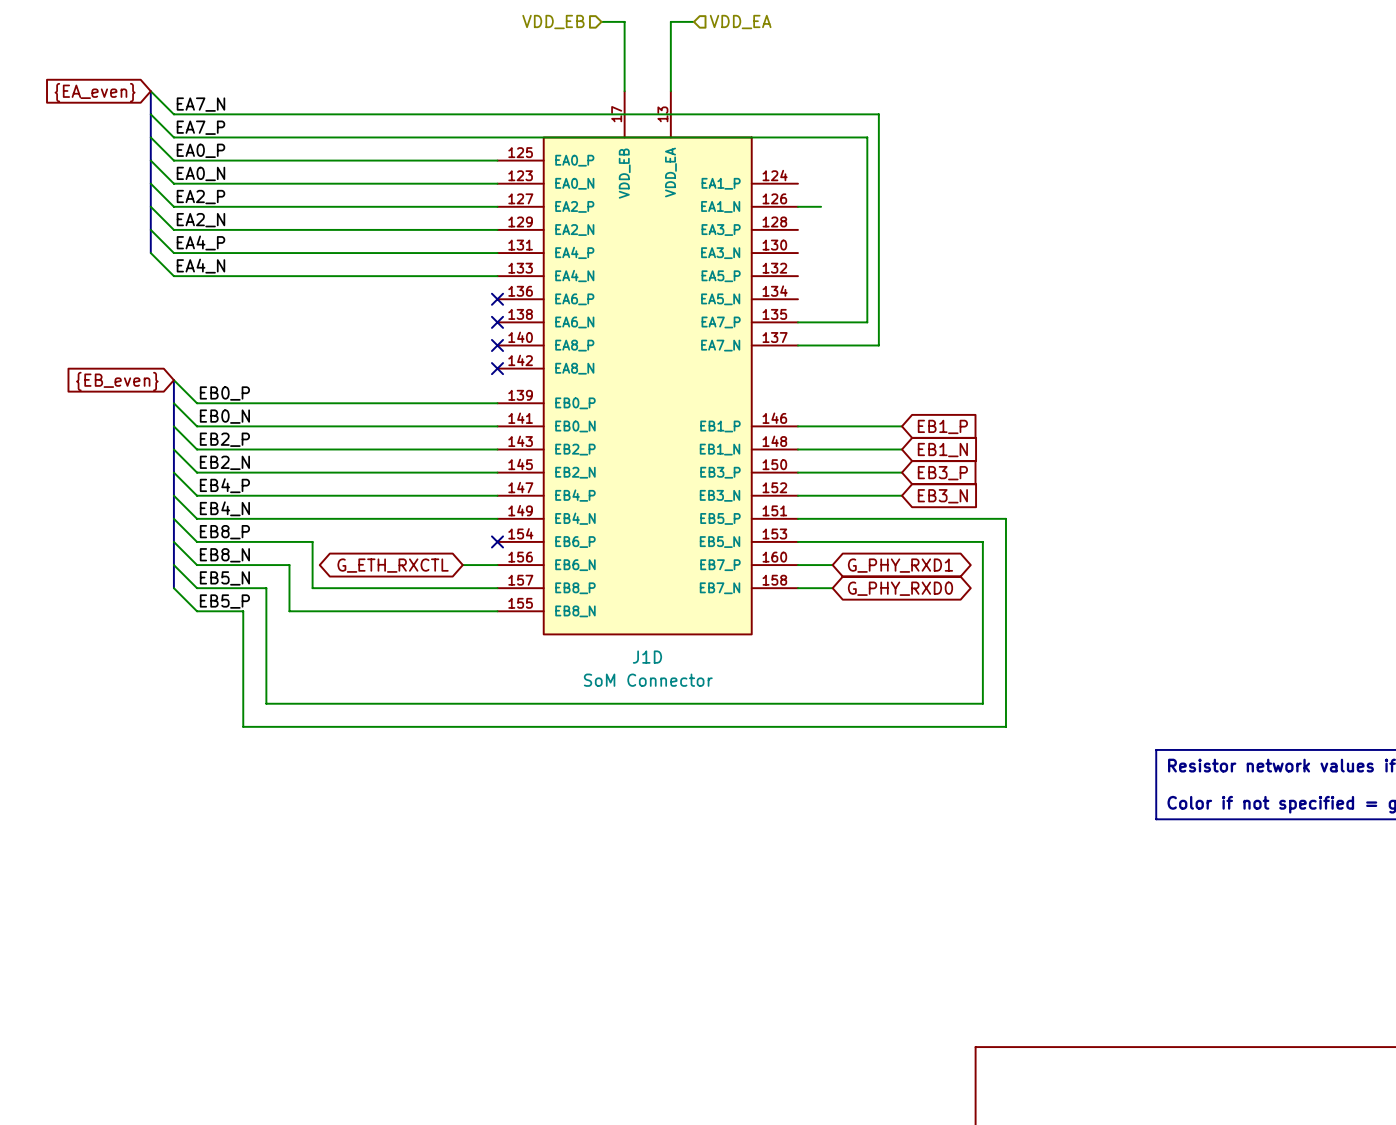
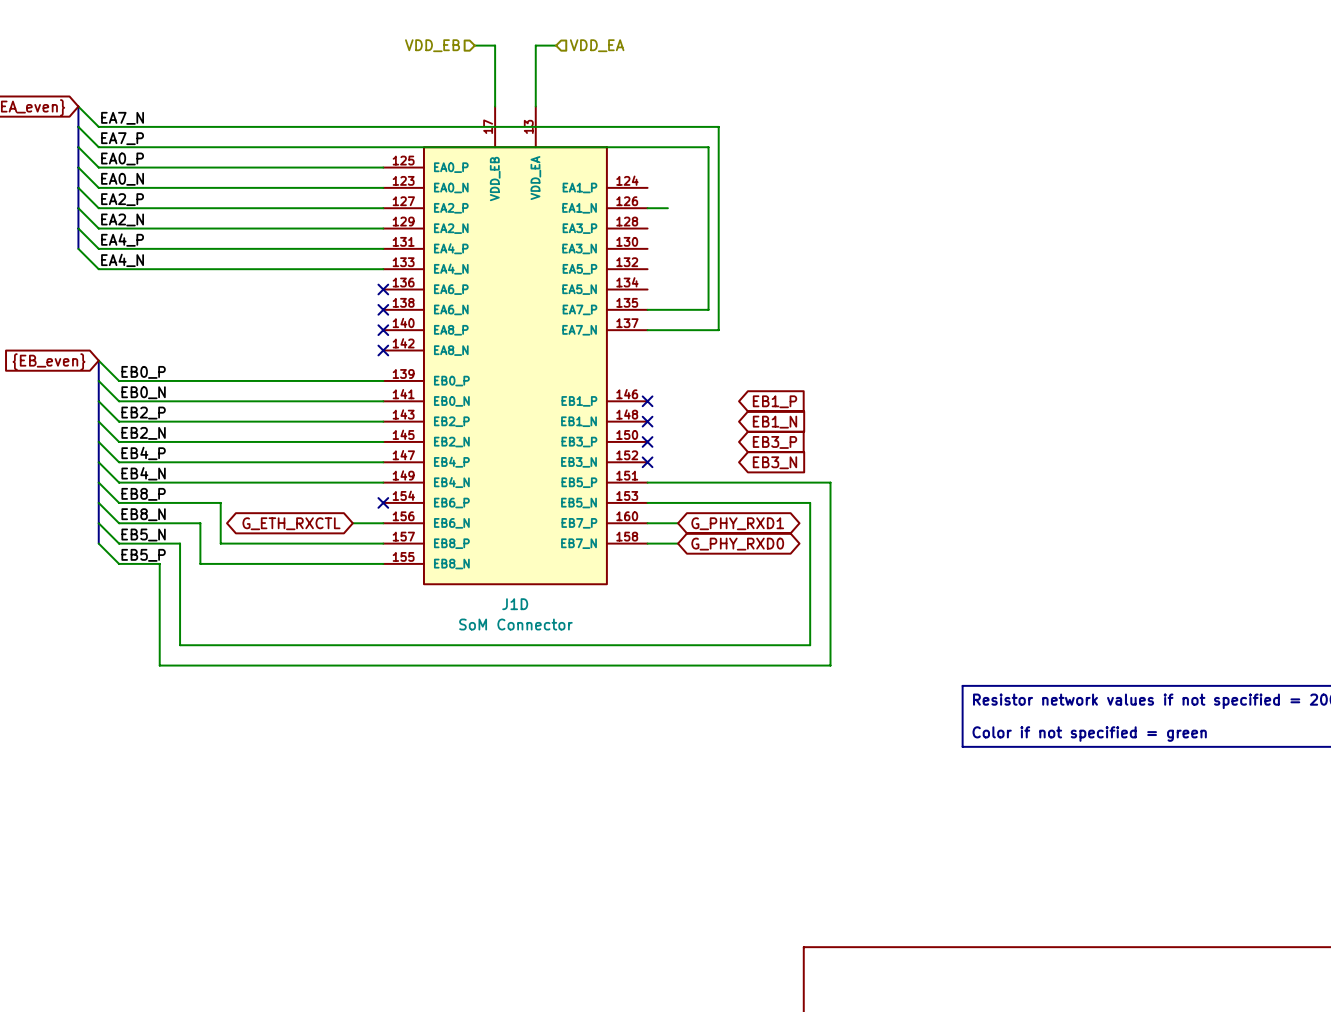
wire: (797, 426) (901, 426) -> none
no-connect mark: none -> (647, 401)
wire: (797, 449) (901, 449) -> none
no-connect mark: none -> (647, 421)
wire: (797, 472) (901, 472) -> none
no-connect mark: none -> (647, 441)
wire: (797, 495) (901, 495) -> none
no-connect mark: none -> (647, 462)

